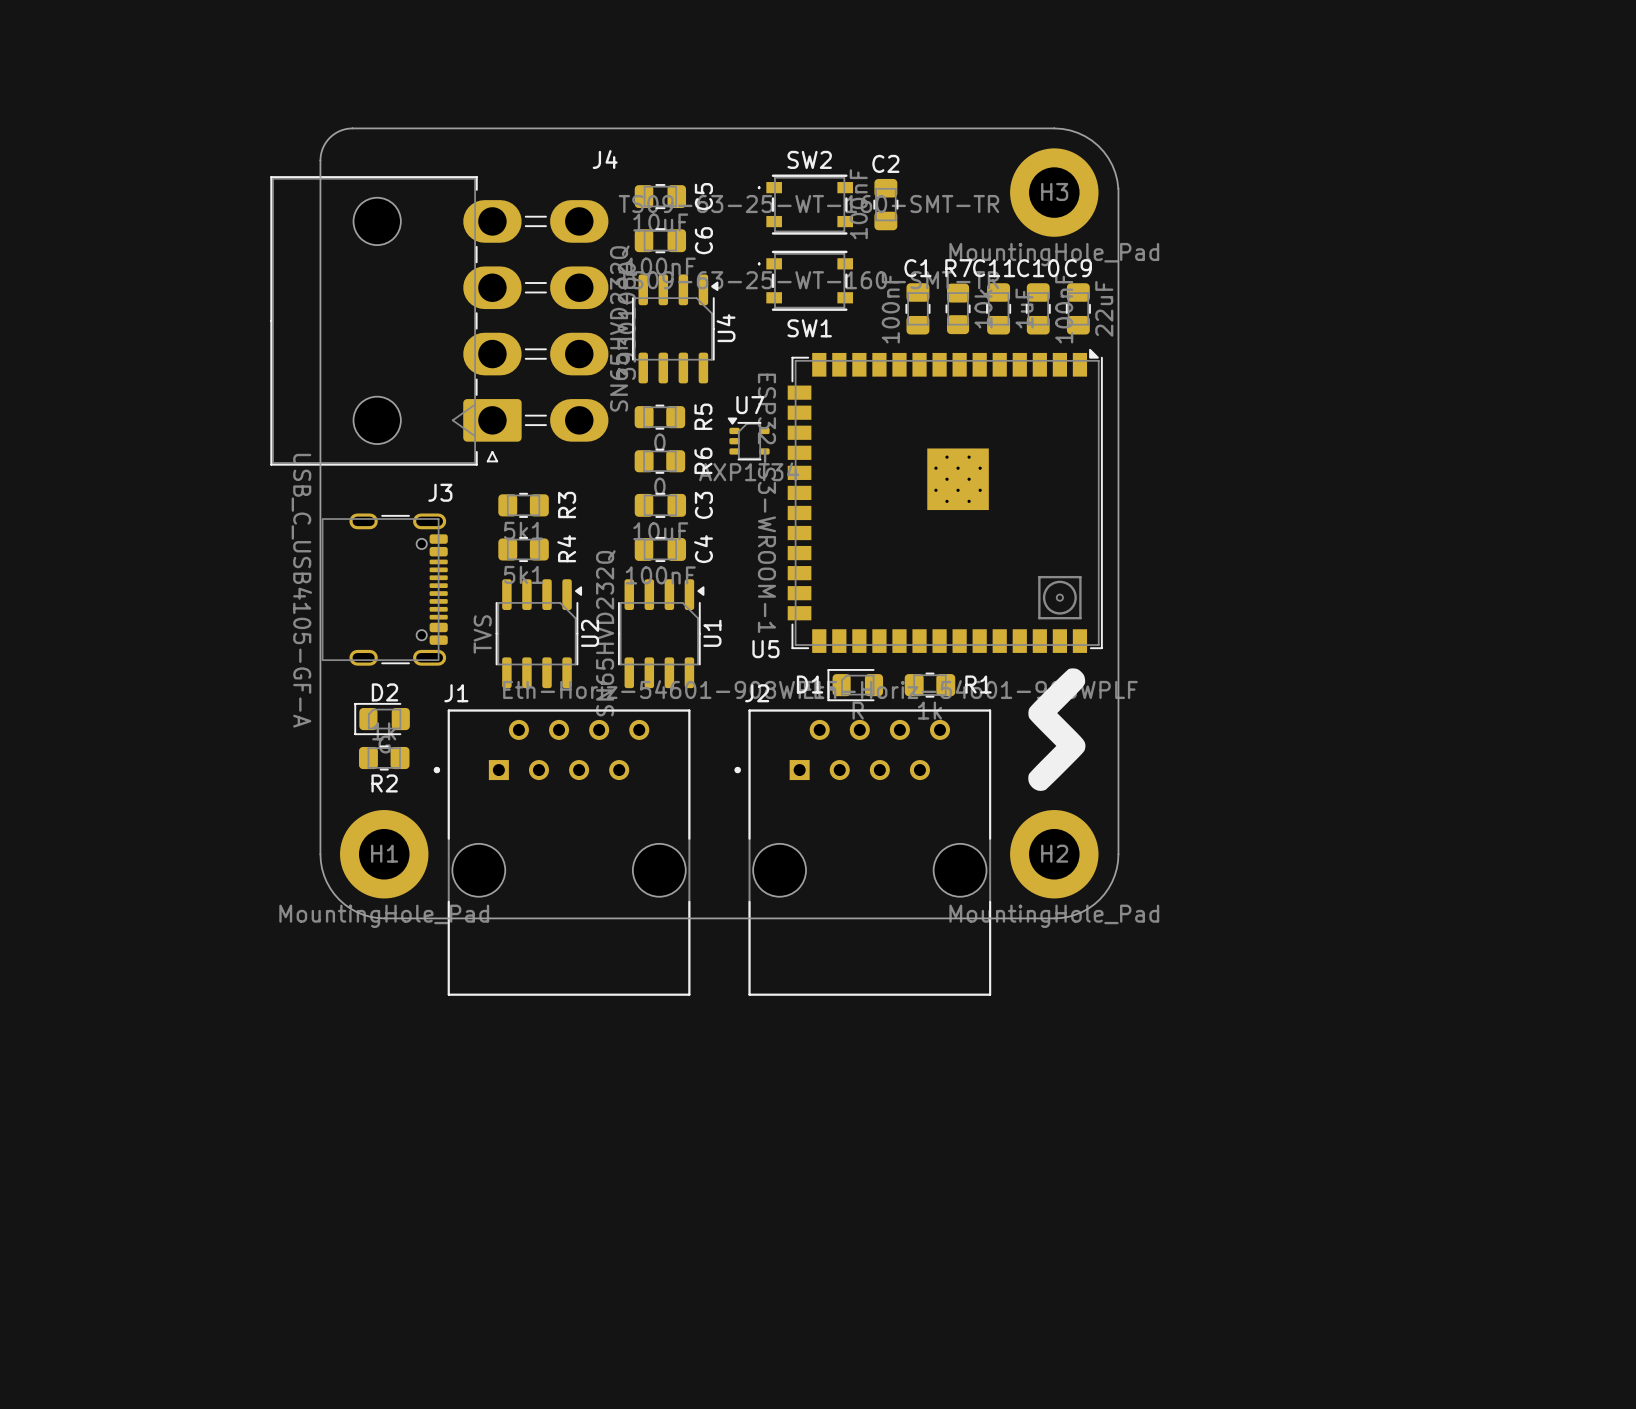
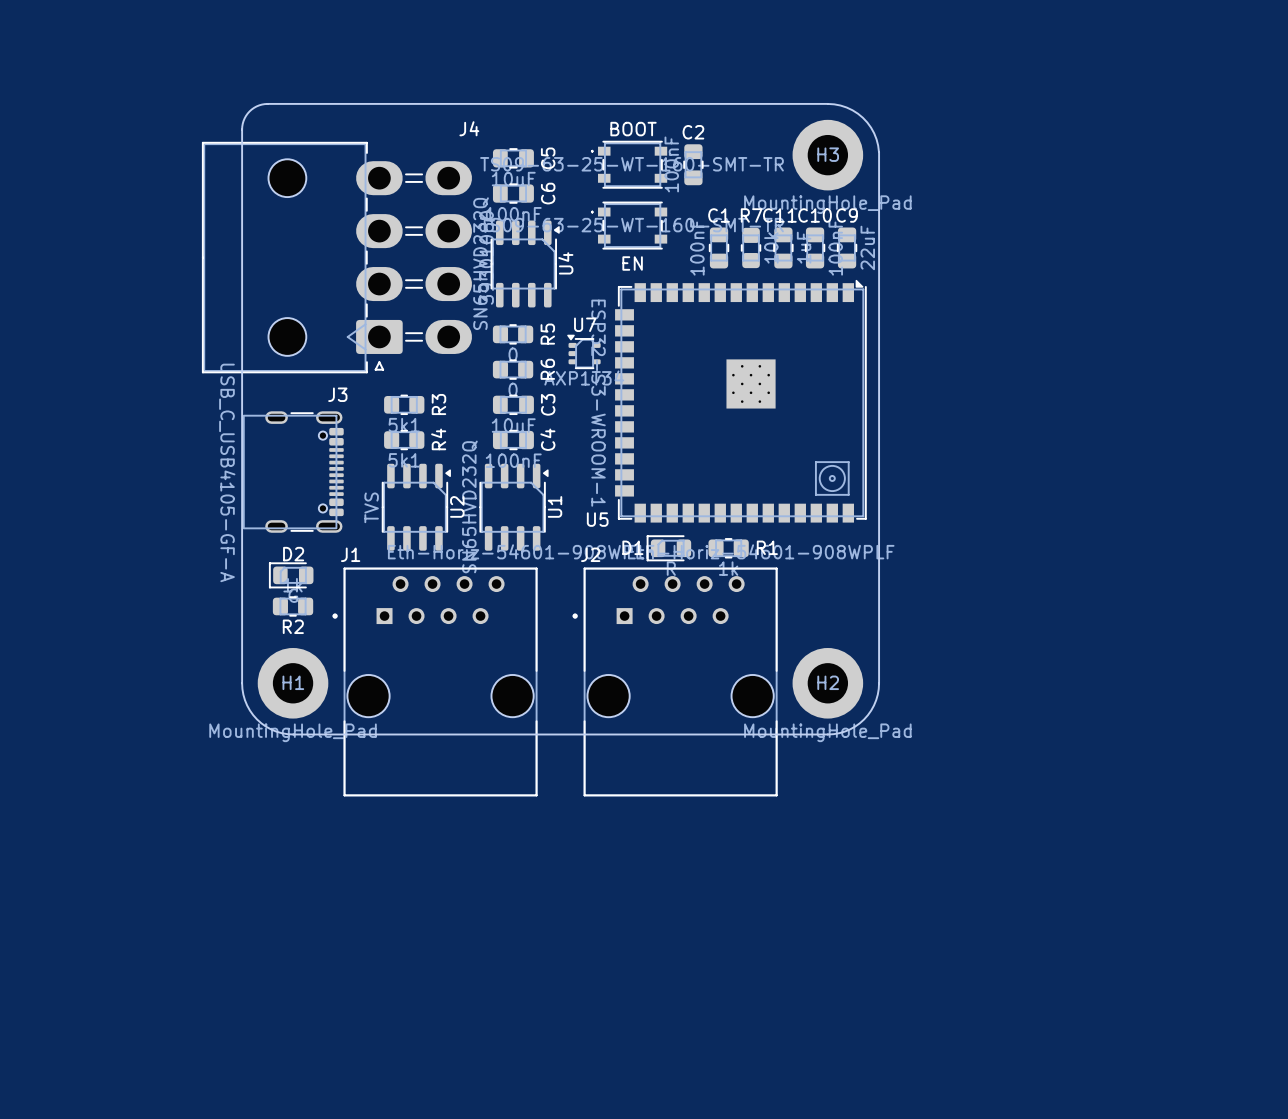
SW2 name: SW2 (809, 159) -> BOOT (633, 129)
SW1 name: SW1 (809, 328) -> EN (632, 263)
drawing: [1028, 668, 1086, 791] -> none

